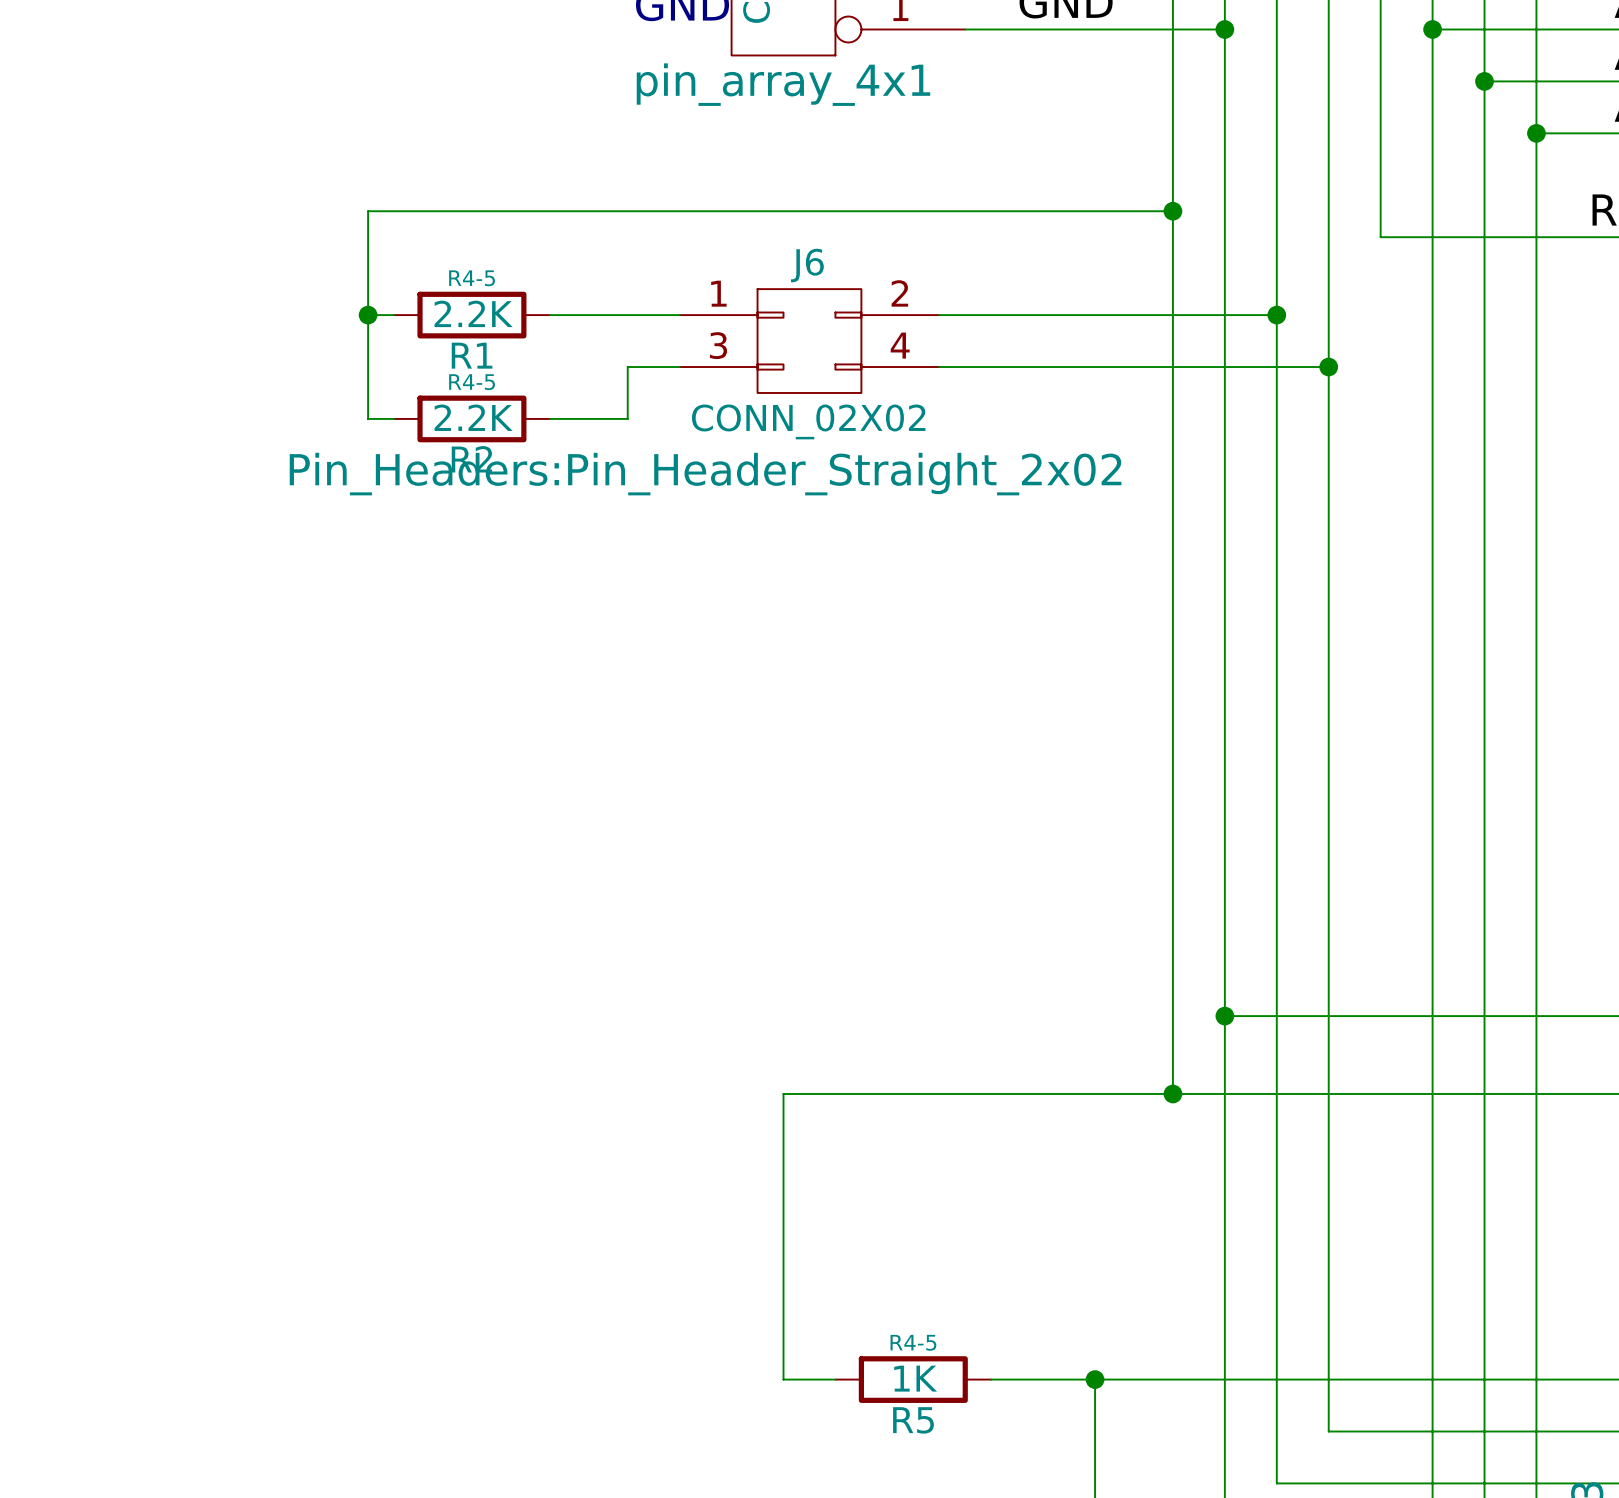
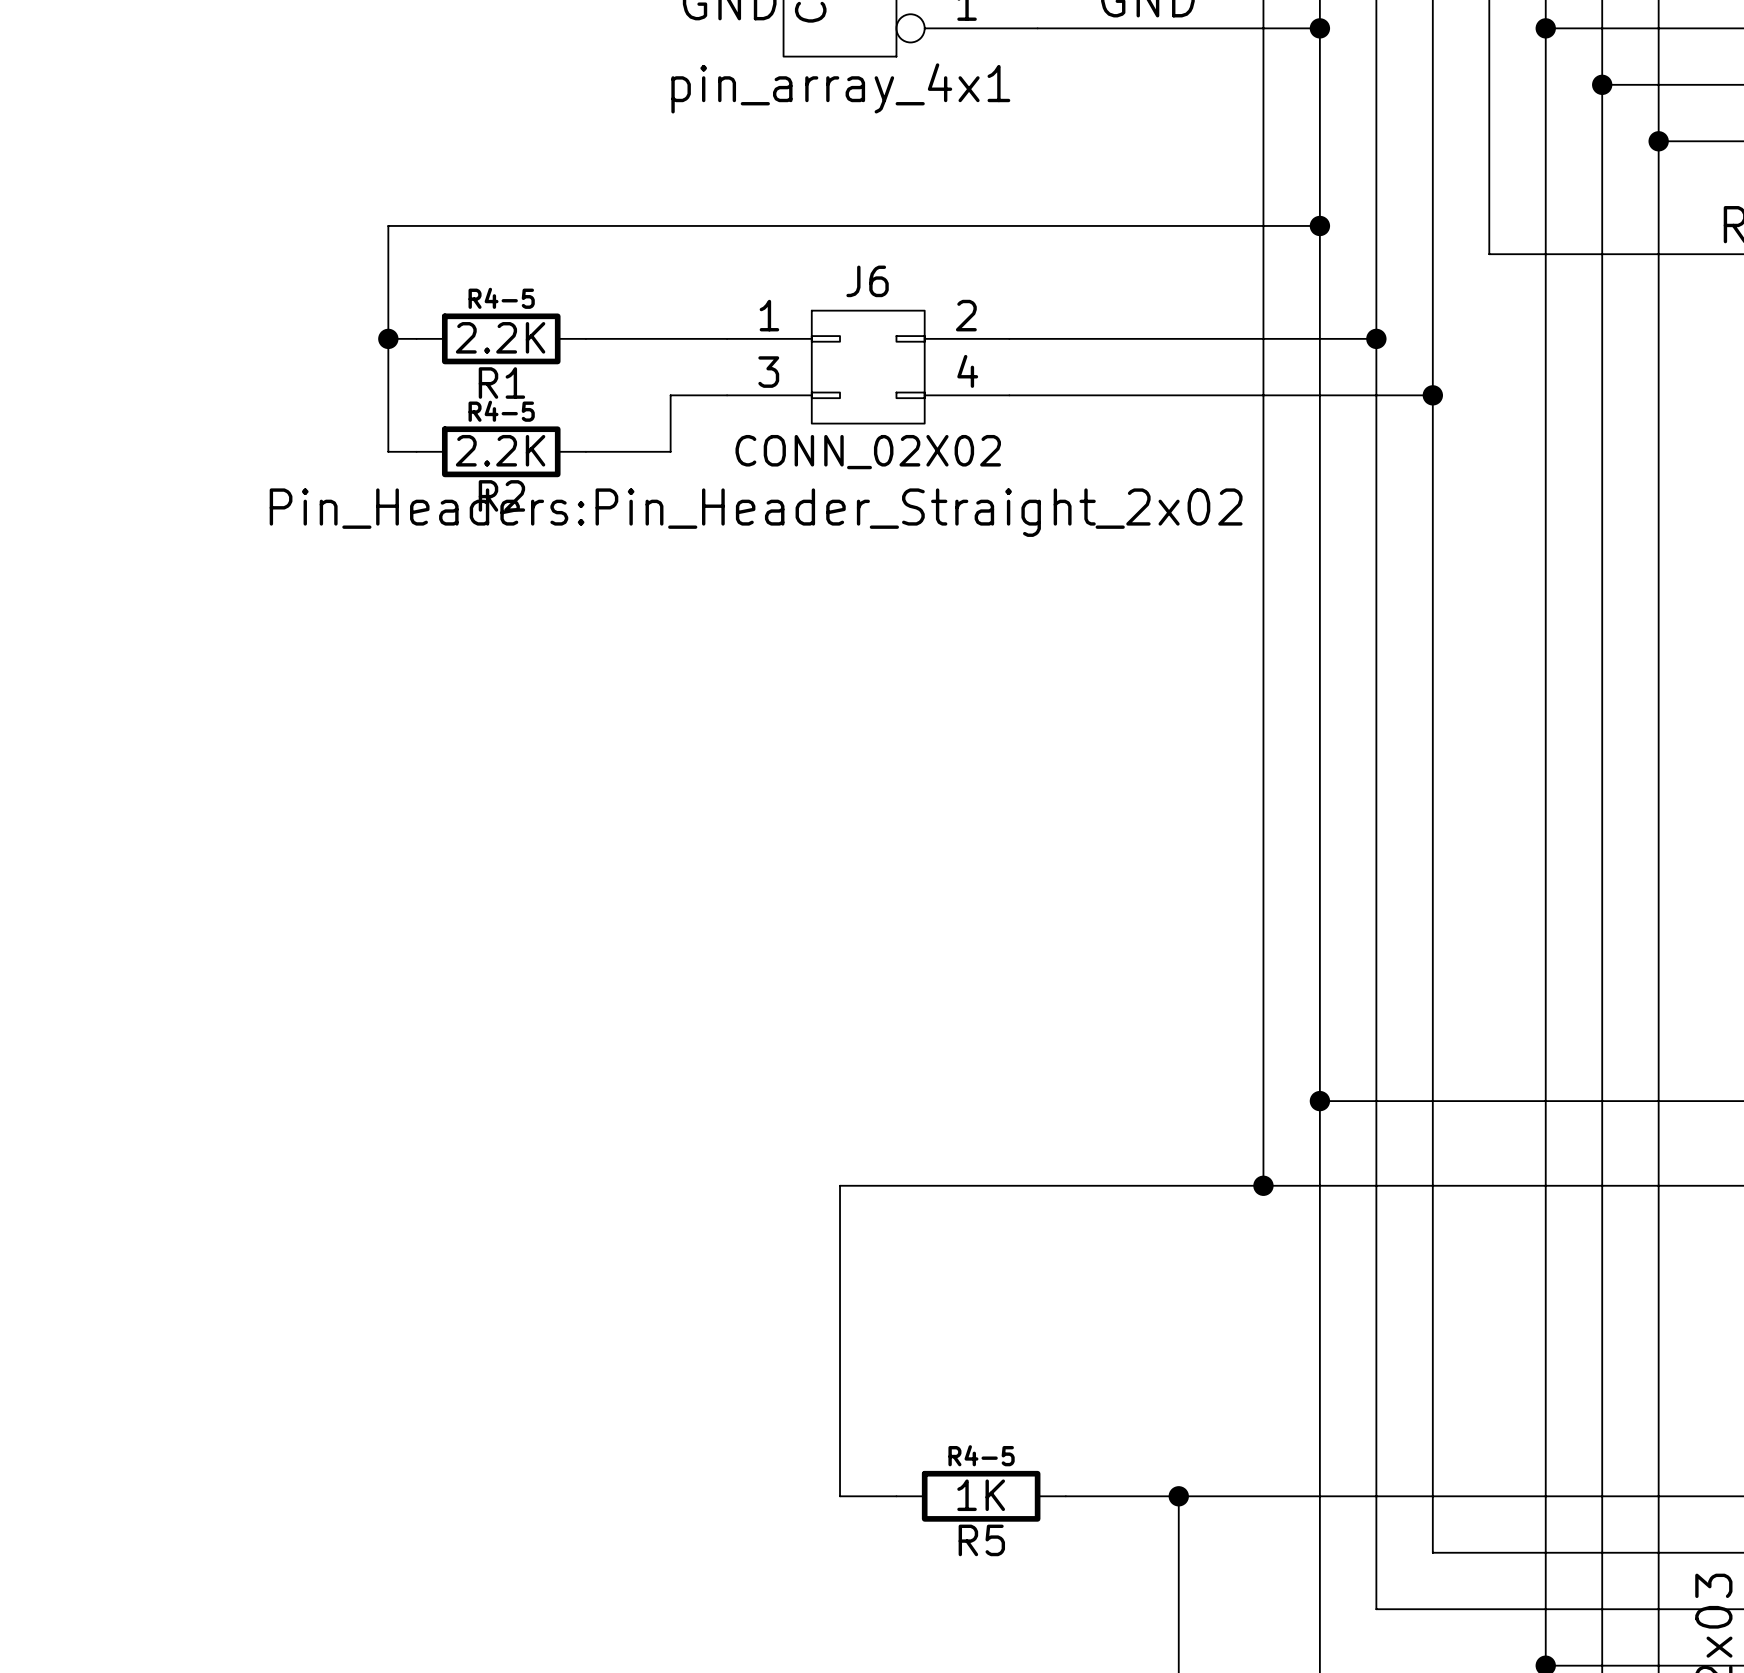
wire: none -> (1263, 225) (1319, 225)
junction position: (1172, 211) -> (1319, 225)

